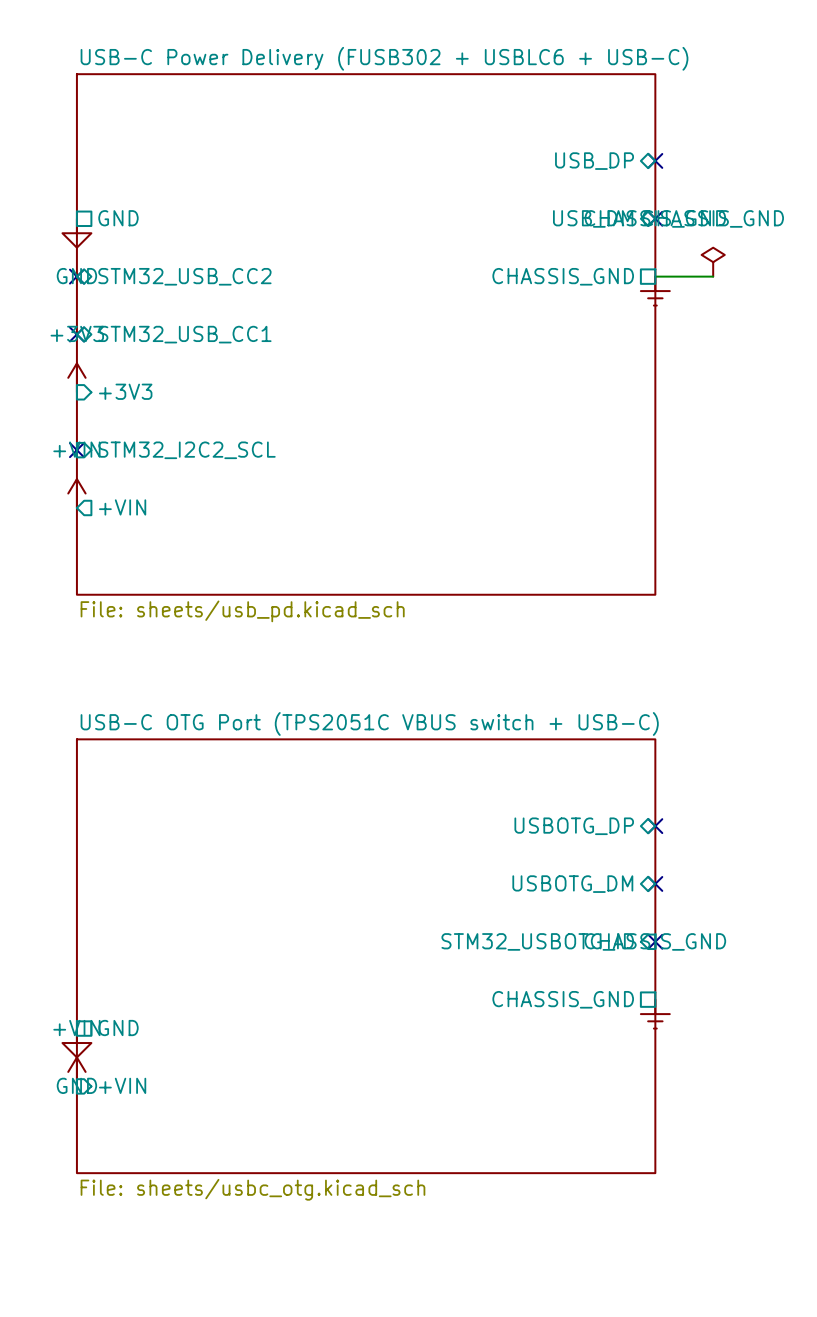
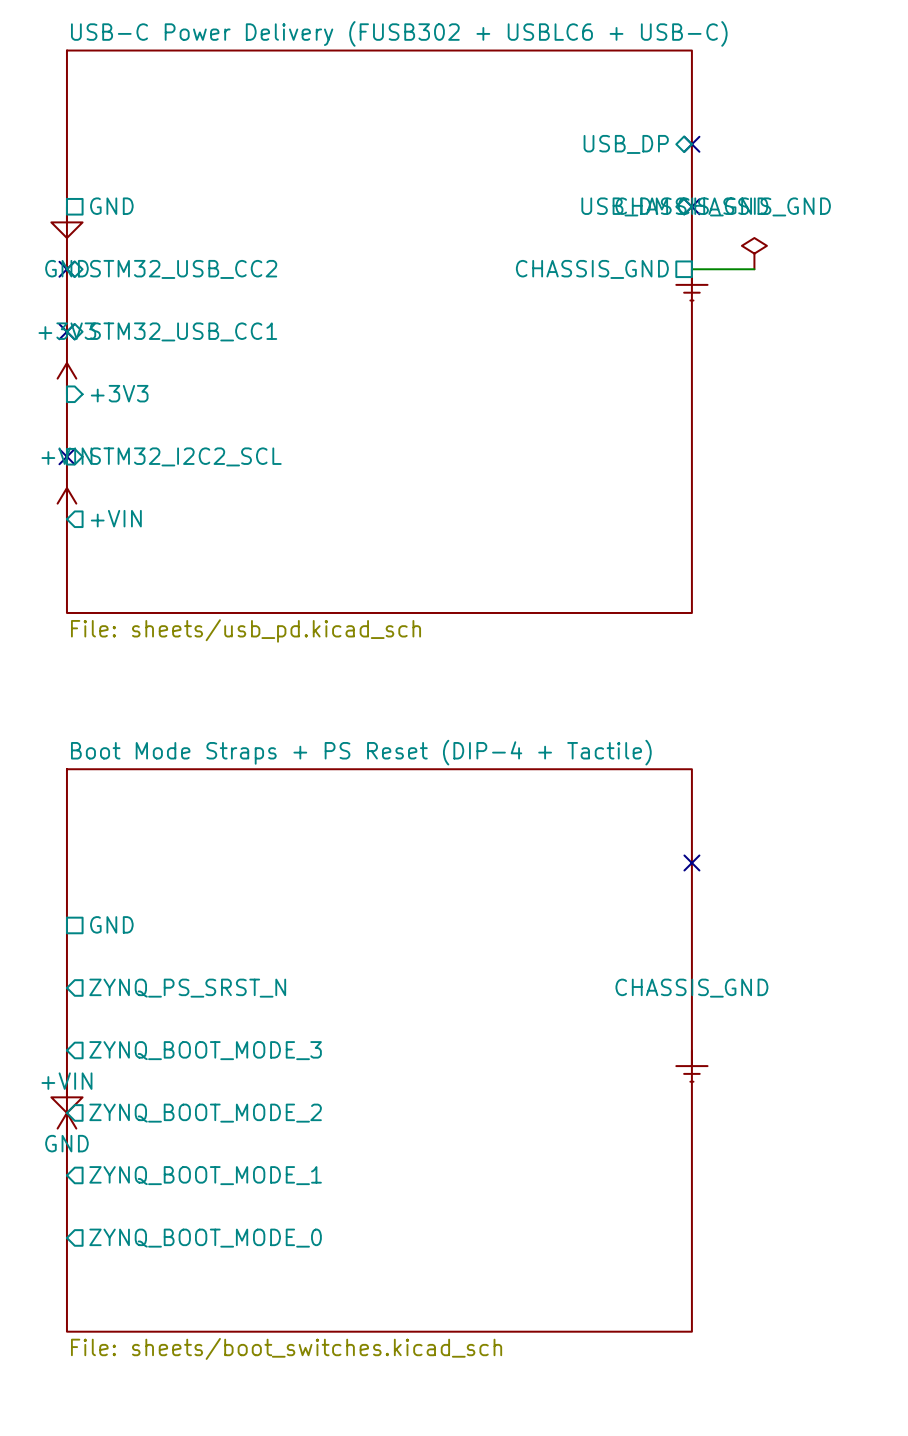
sheet pin: USBOTG_DP (574, 826) -> none
no-connect mark: (655, 883) -> none
sheet pin: USBOTG_DM (572, 884) -> none
sheet pin: none -> ZYNQ_PS_SRST_N (187, 988)
sheet pin: STM32_USBOTG_ID (537, 941) -> none
no-connect mark: (655, 941) -> none
sheet USB-C OTG Port (TPS2051C VBUS switch + USB-C): File: sheets/usbc_otg.kicad_sch (366, 956) -> none
sheet pin: none -> ZYNQ_BOOT_MODE_3 (205, 1050)
sheet Boot Mode Straps + PS Reset (DIP-4 + Tactile): none -> File: sheets/boot_switches.kicad_sch (379, 1050)
sheet pin: CHASSIS_GND (563, 999) -> none
sheet pin position: GND (118, 1028) -> GND (111, 924)
sheet pin: none -> ZYNQ_BOOT_MODE_2 (205, 1113)
sheet pin: +VIN (122, 1085) -> none
sheet pin: none -> ZYNQ_BOOT_MODE_1 (205, 1175)
sheet pin: none -> ZYNQ_BOOT_MODE_0 (205, 1238)

